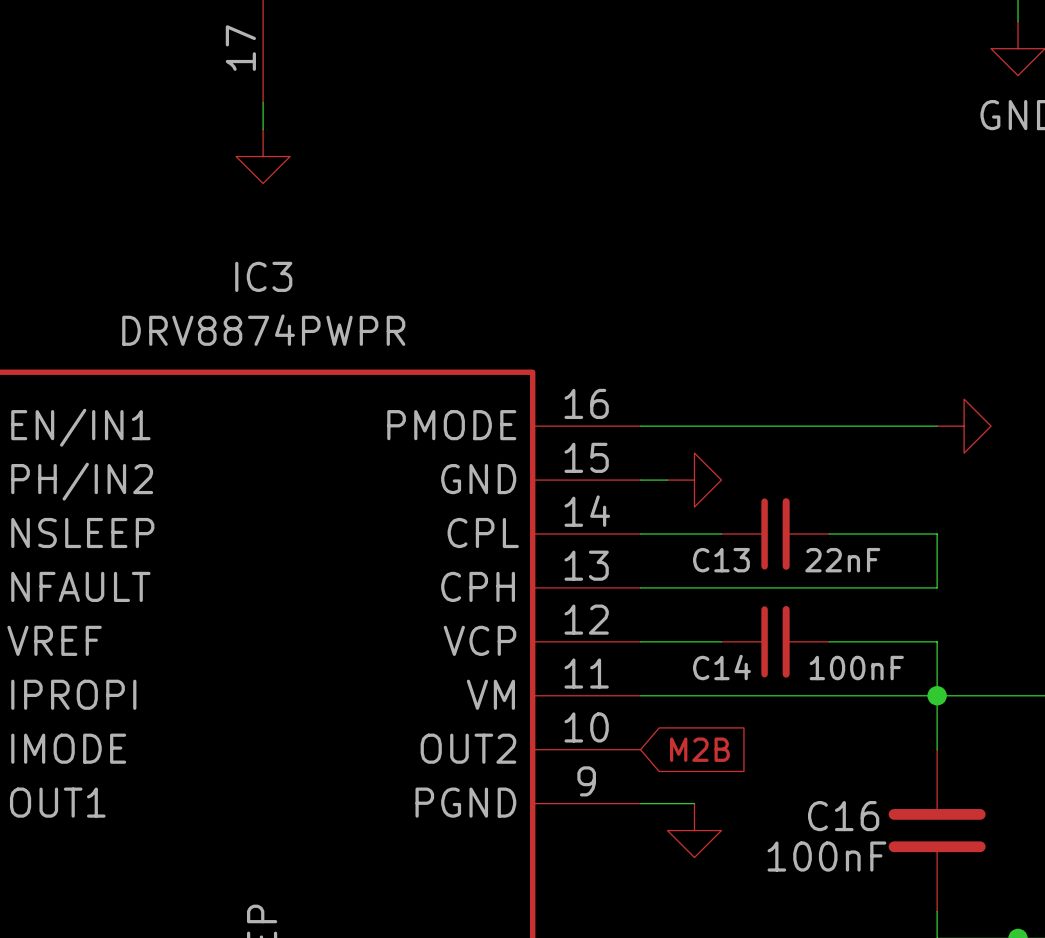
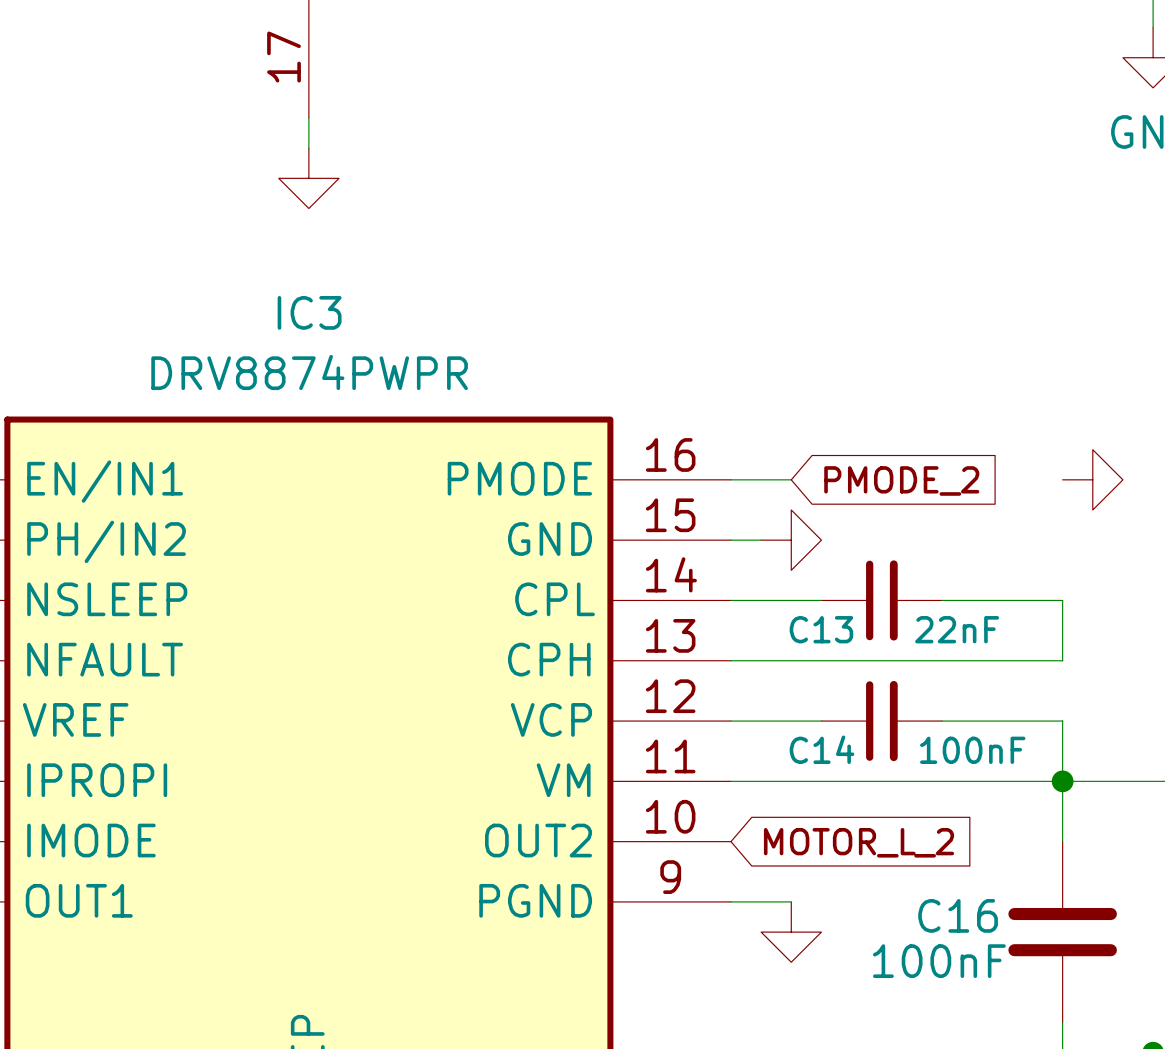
wire: (694, 426) (937, 426) -> none
global label: none -> PMODE_2 (901, 480)
global label: M2B (699, 749) -> MOTOR_L_2 (858, 842)

